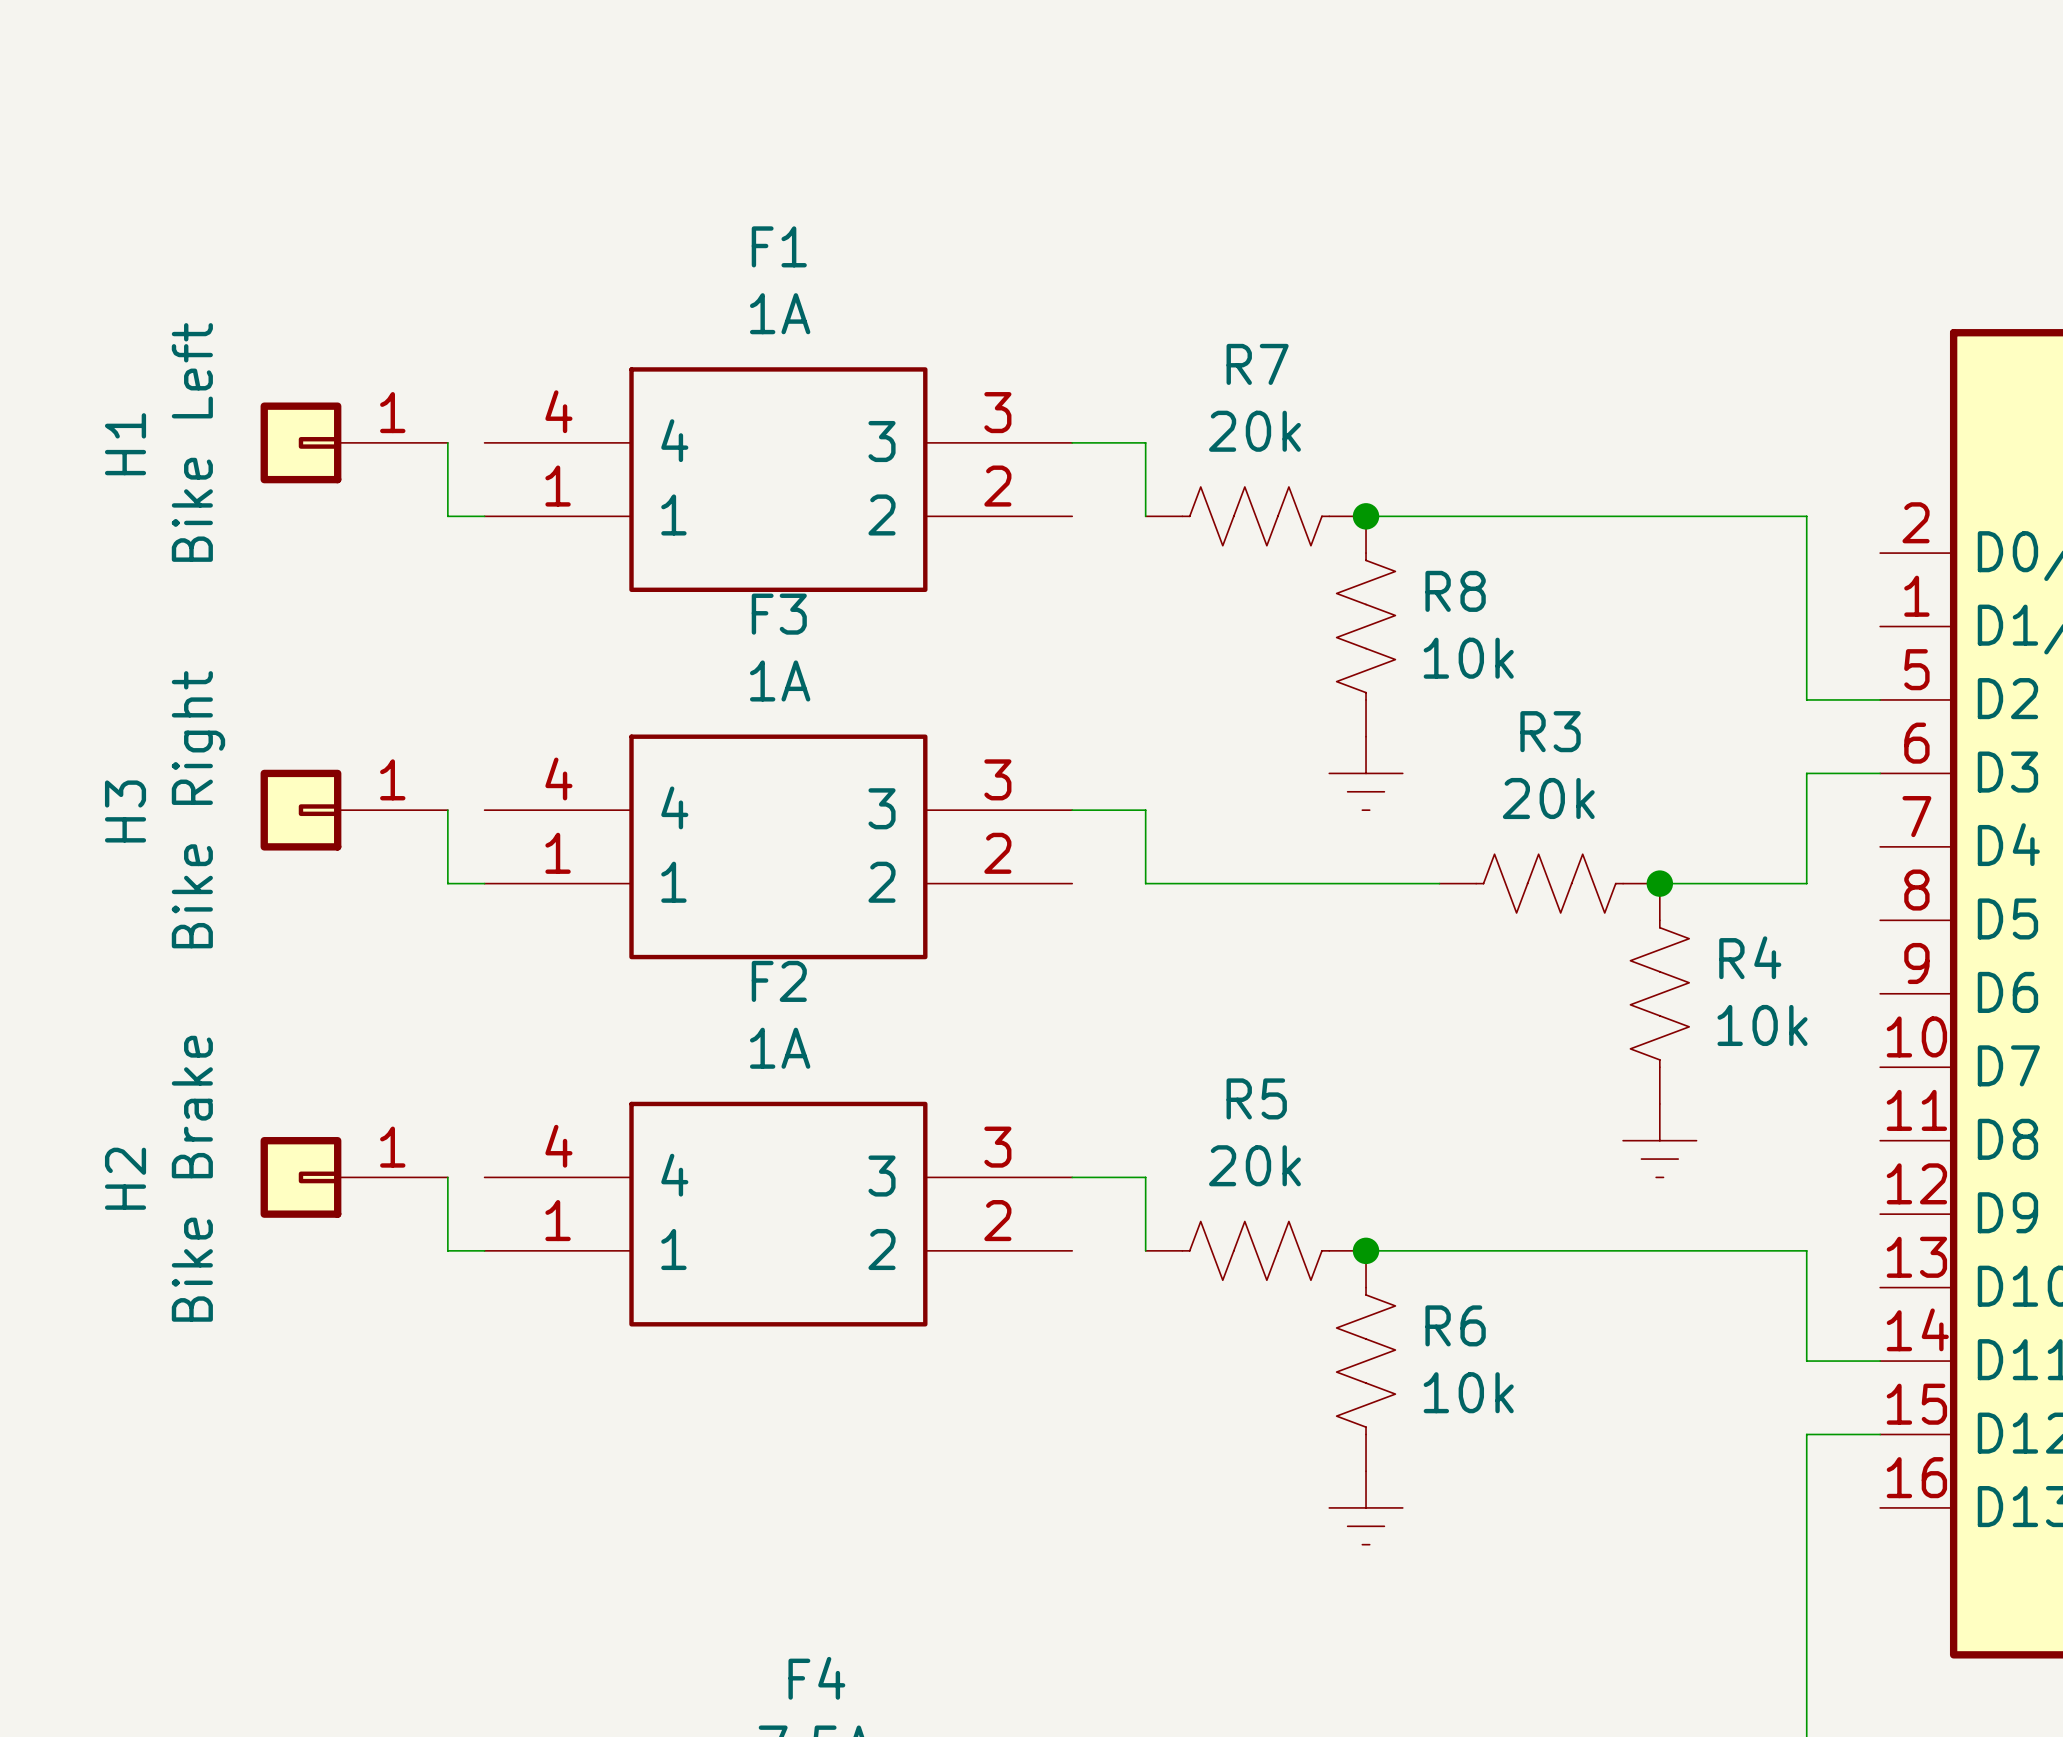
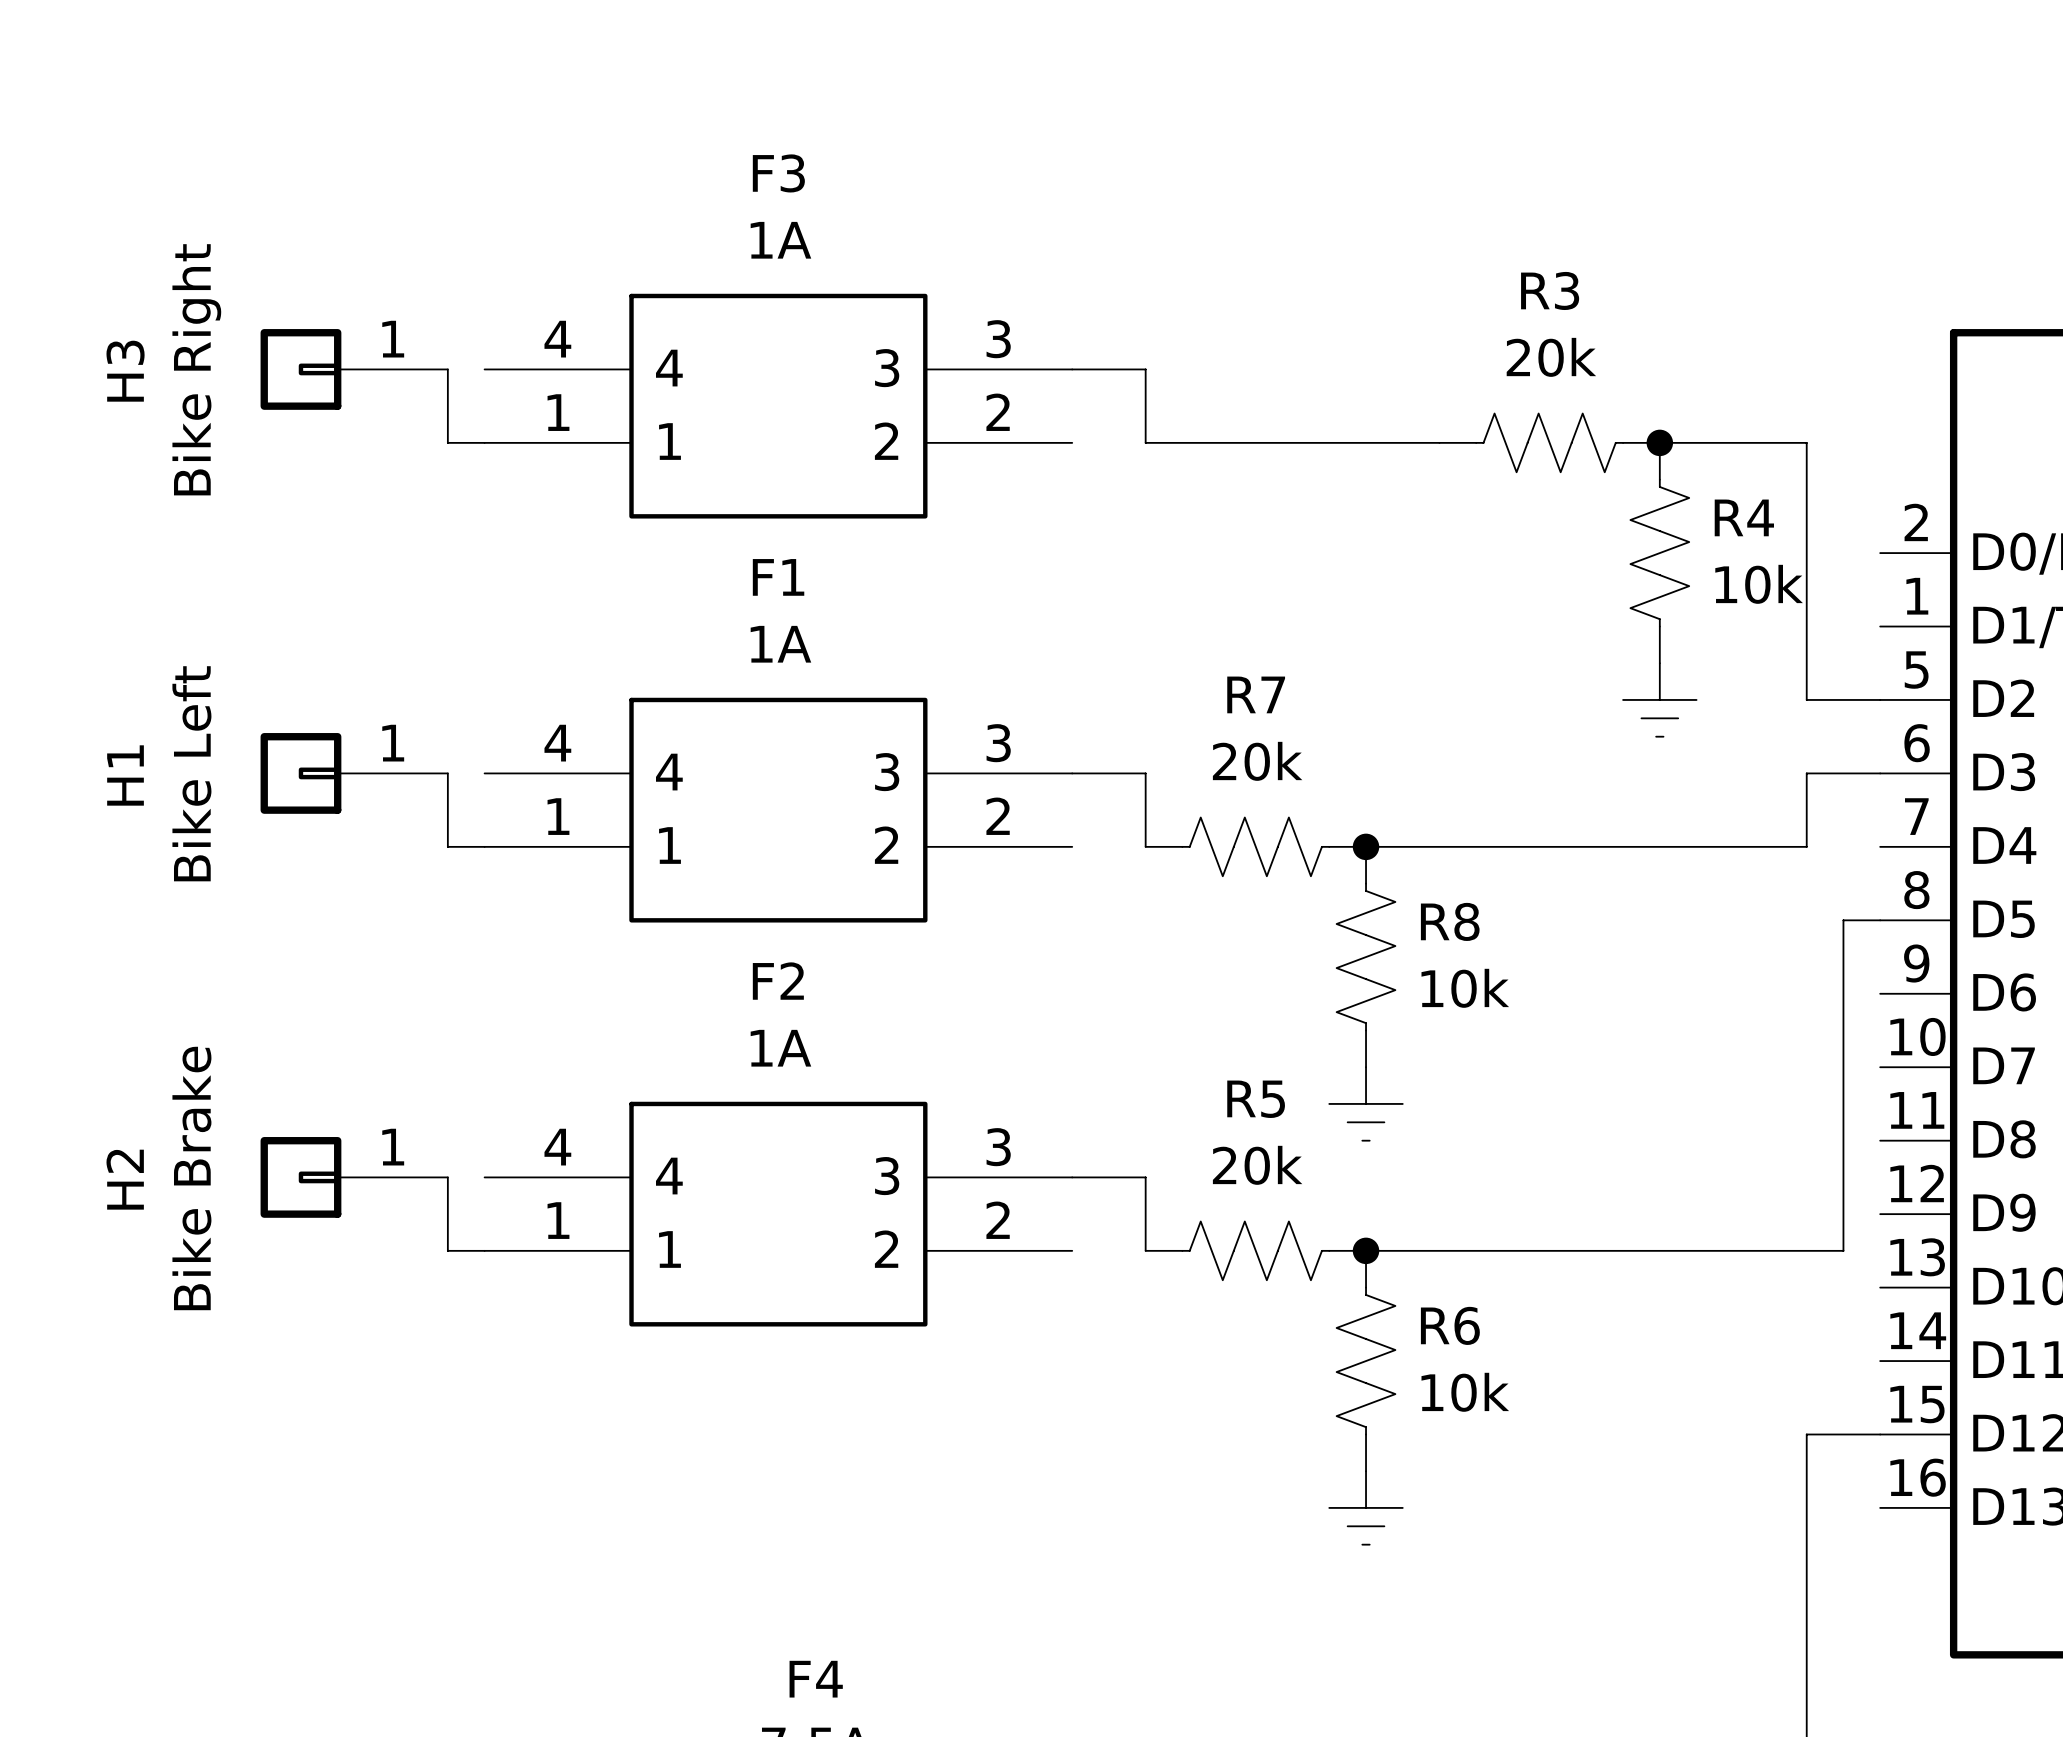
wire: none -> (1072, 369) (1145, 369) (1145, 442) (1439, 442)
H1 position: (354, 442) -> (354, 773)
wire: (447, 442) (447, 516) (484, 516) -> (447, 369) (447, 442) (484, 442)
wire: (1072, 442) (1145, 442) (1145, 516) -> none
junction: none -> (1659, 442)
F1 position: (778, 479) -> (778, 810)
R7 position: (1255, 516) -> (1255, 846)
wire: (1366, 516) (1806, 516) -> (1659, 442) (1806, 442) (1806, 516)
junction: (1366, 516) -> none
R8 position: (1366, 626) -> (1366, 957)
power symbol: none -> (1659, 699)
wire: none -> (447, 773) (447, 810)
power symbol: (1366, 773) -> none
H3 position: (354, 810) -> (354, 369)
wire: (1072, 810) (1145, 810) -> (1072, 773) (1145, 773) (1145, 810)
wire: (447, 846) (447, 883) (484, 883) -> (447, 846) (484, 846)
F3 position: (778, 846) -> (778, 406)
wire: (1145, 846) (1145, 883) (1439, 883) -> none
junction: none -> (1366, 846)
wire: (1806, 846) (1806, 883) (1659, 883) -> (1806, 846) (1366, 846)
R3 position: (1549, 883) -> (1549, 442)
junction: (1659, 883) -> none
R4 position: (1659, 993) -> (1659, 553)
power symbol: none -> (1366, 1103)
power symbol: (1659, 1140) -> none
wire: (1806, 1250) (1806, 1361) (1880, 1361) -> (1806, 1250) (1843, 1250) (1843, 920) (1880, 920)

